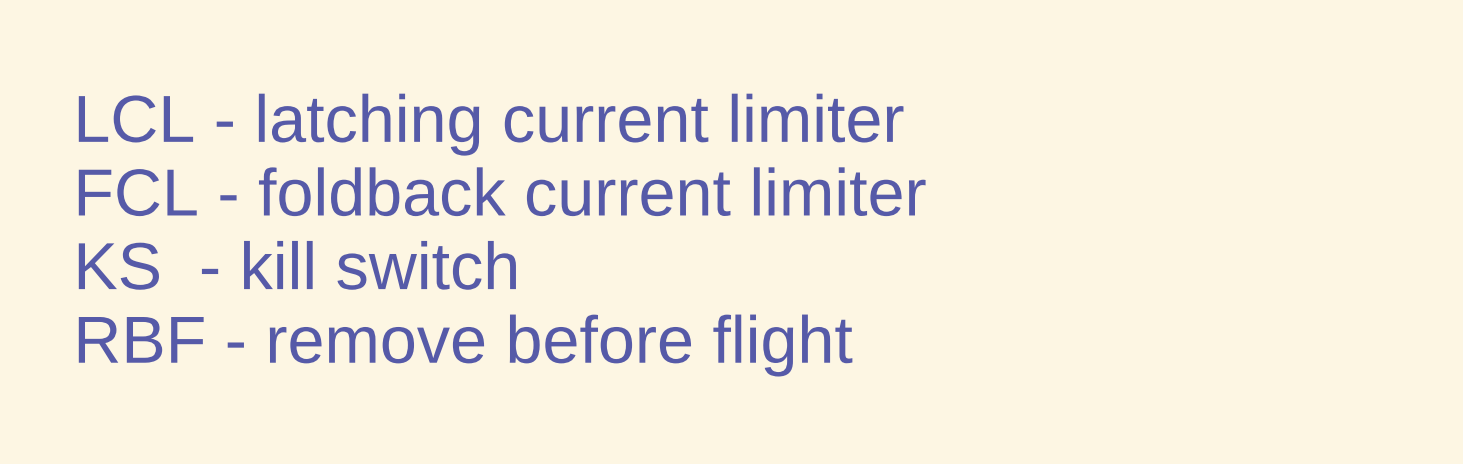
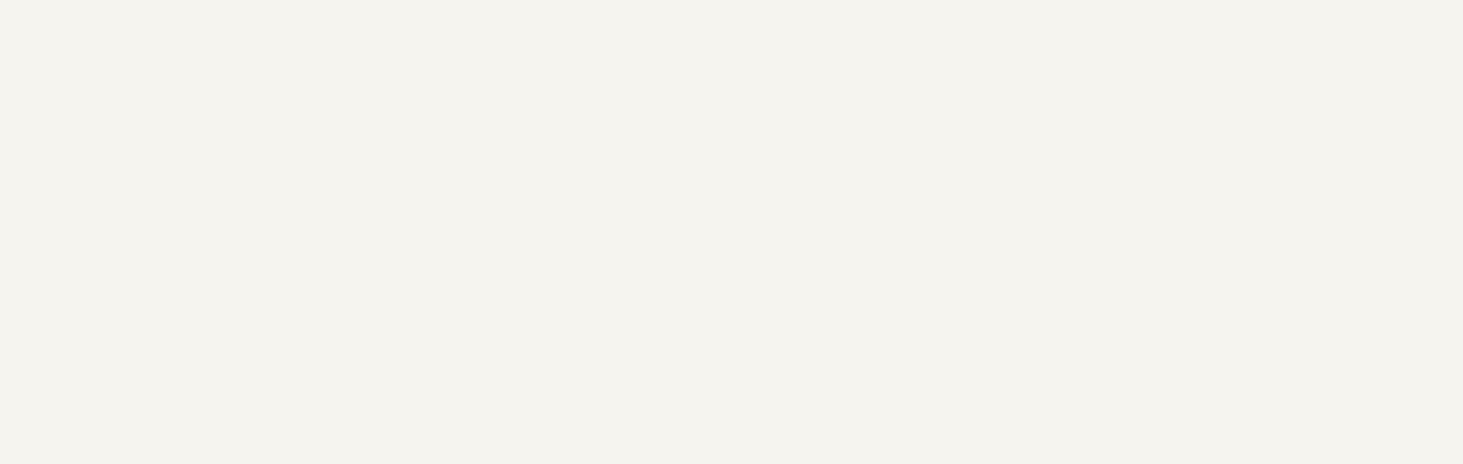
text: LCL - latching current limiter (491, 124) -> none
text: FCL - foldback current limiter (502, 191) -> none
text: KS - kill switch (297, 265) -> none
text: RBF - remove before flight (465, 345) -> none

